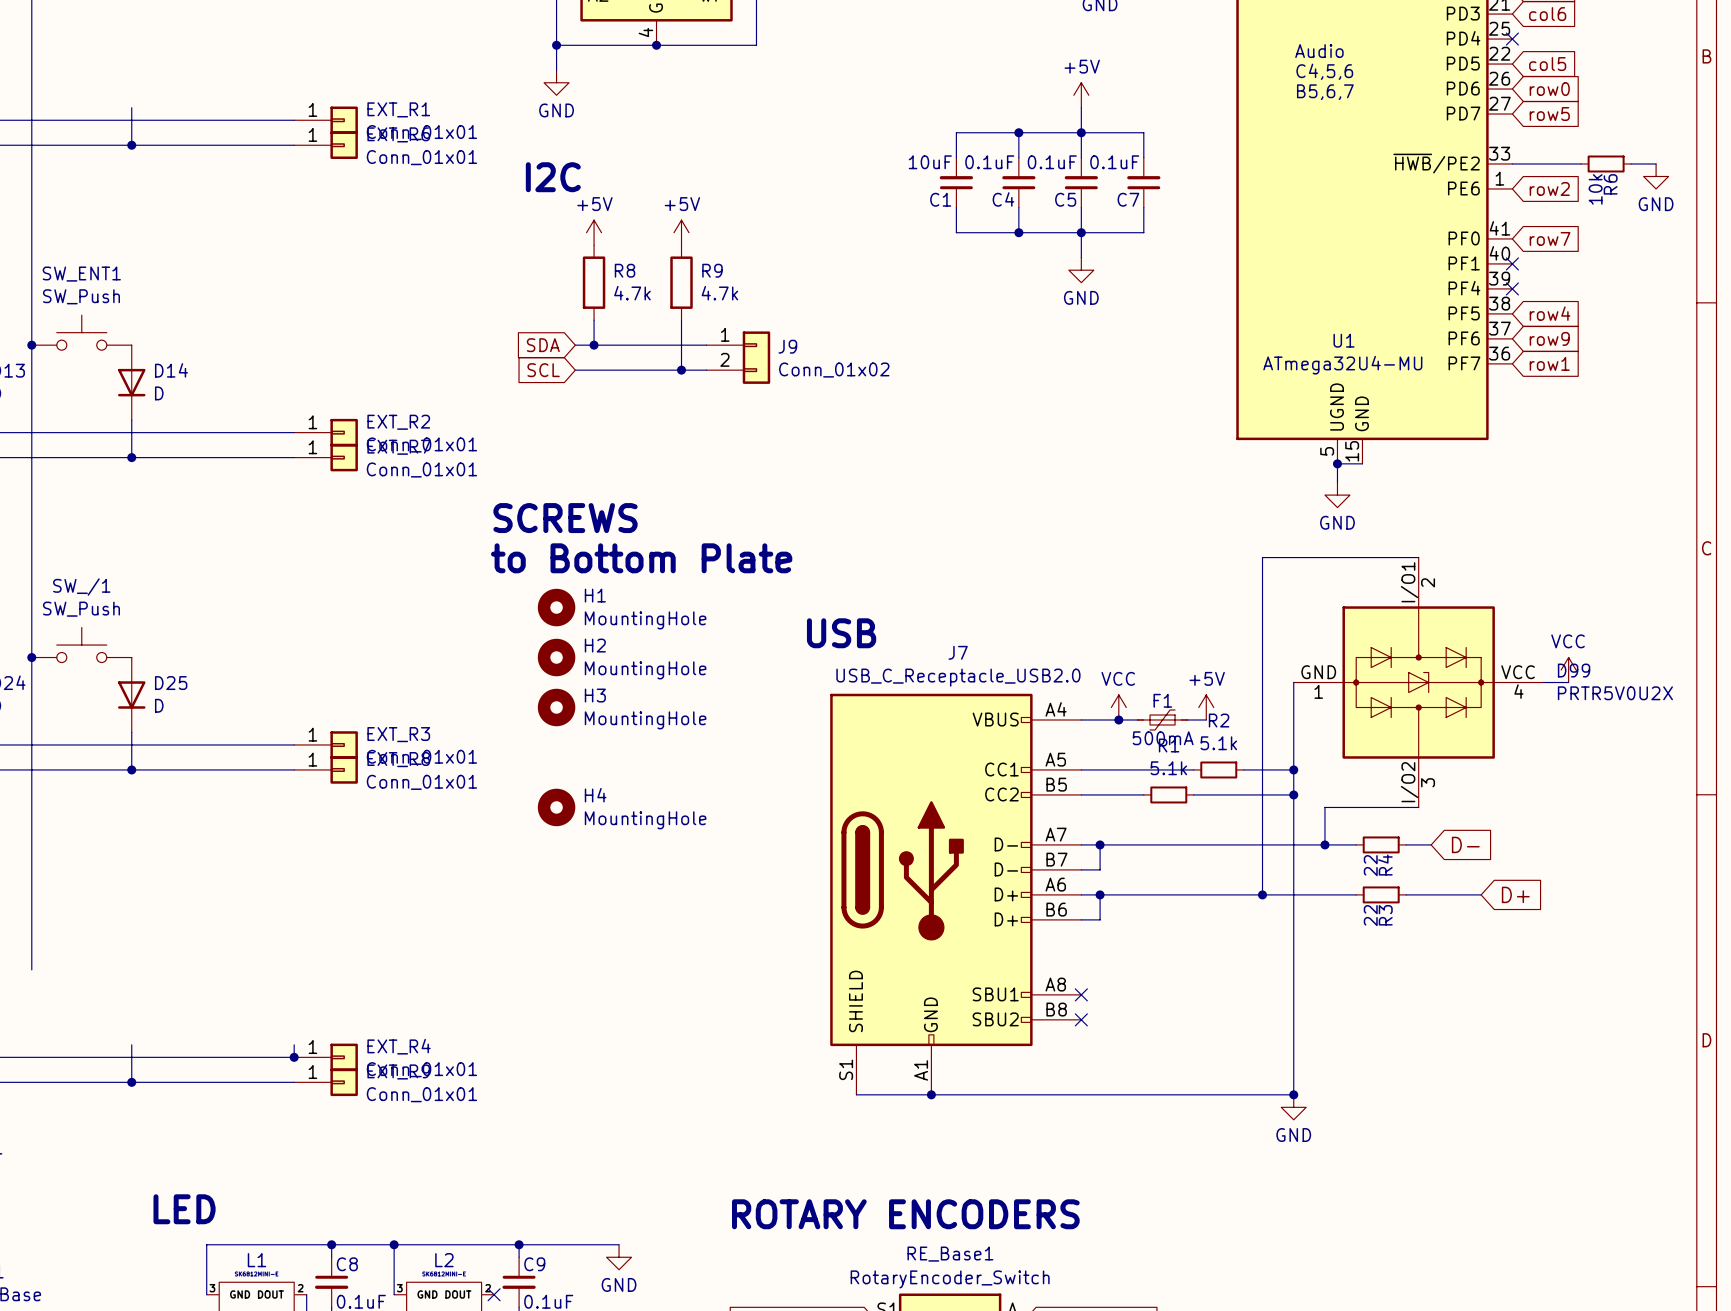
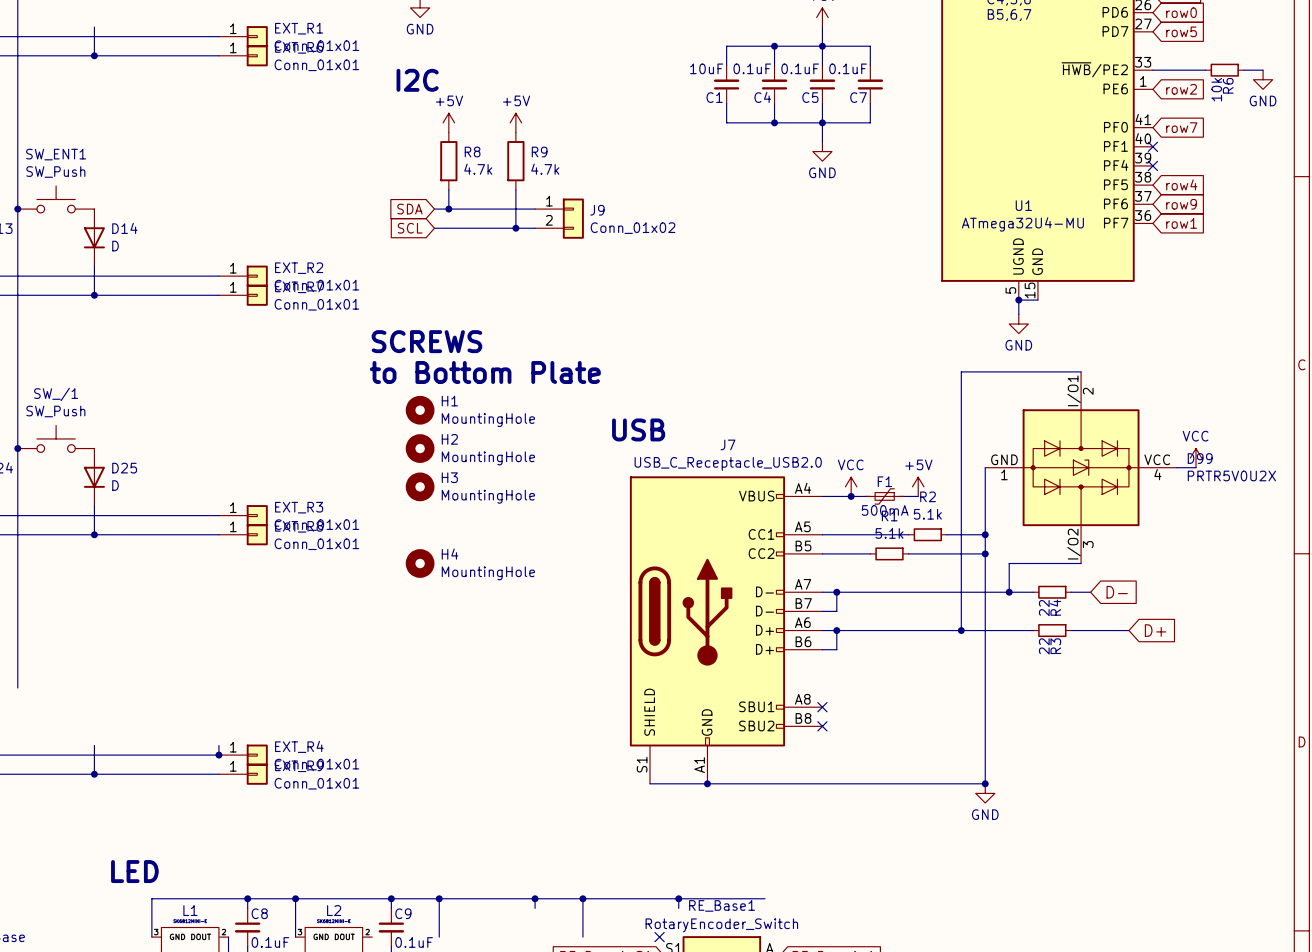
text: ROTARY ENCODERS (905, 1214) -> none
wire: none -> (439, 898) (439, 937)
junction: none -> (439, 898)
wire: none -> (468, 898) (764, 898)
wire: none -> (535, 898) (535, 908)
junction: none -> (535, 898)
wire: none -> (582, 898) (582, 937)
junction: none -> (582, 898)
wire: none -> (678, 898) (678, 908)
junction: none -> (678, 898)
power symbol: GND (619, 1257) -> none
no-connect mark: (494, 1294) -> none
no-connect mark: none -> (659, 937)

